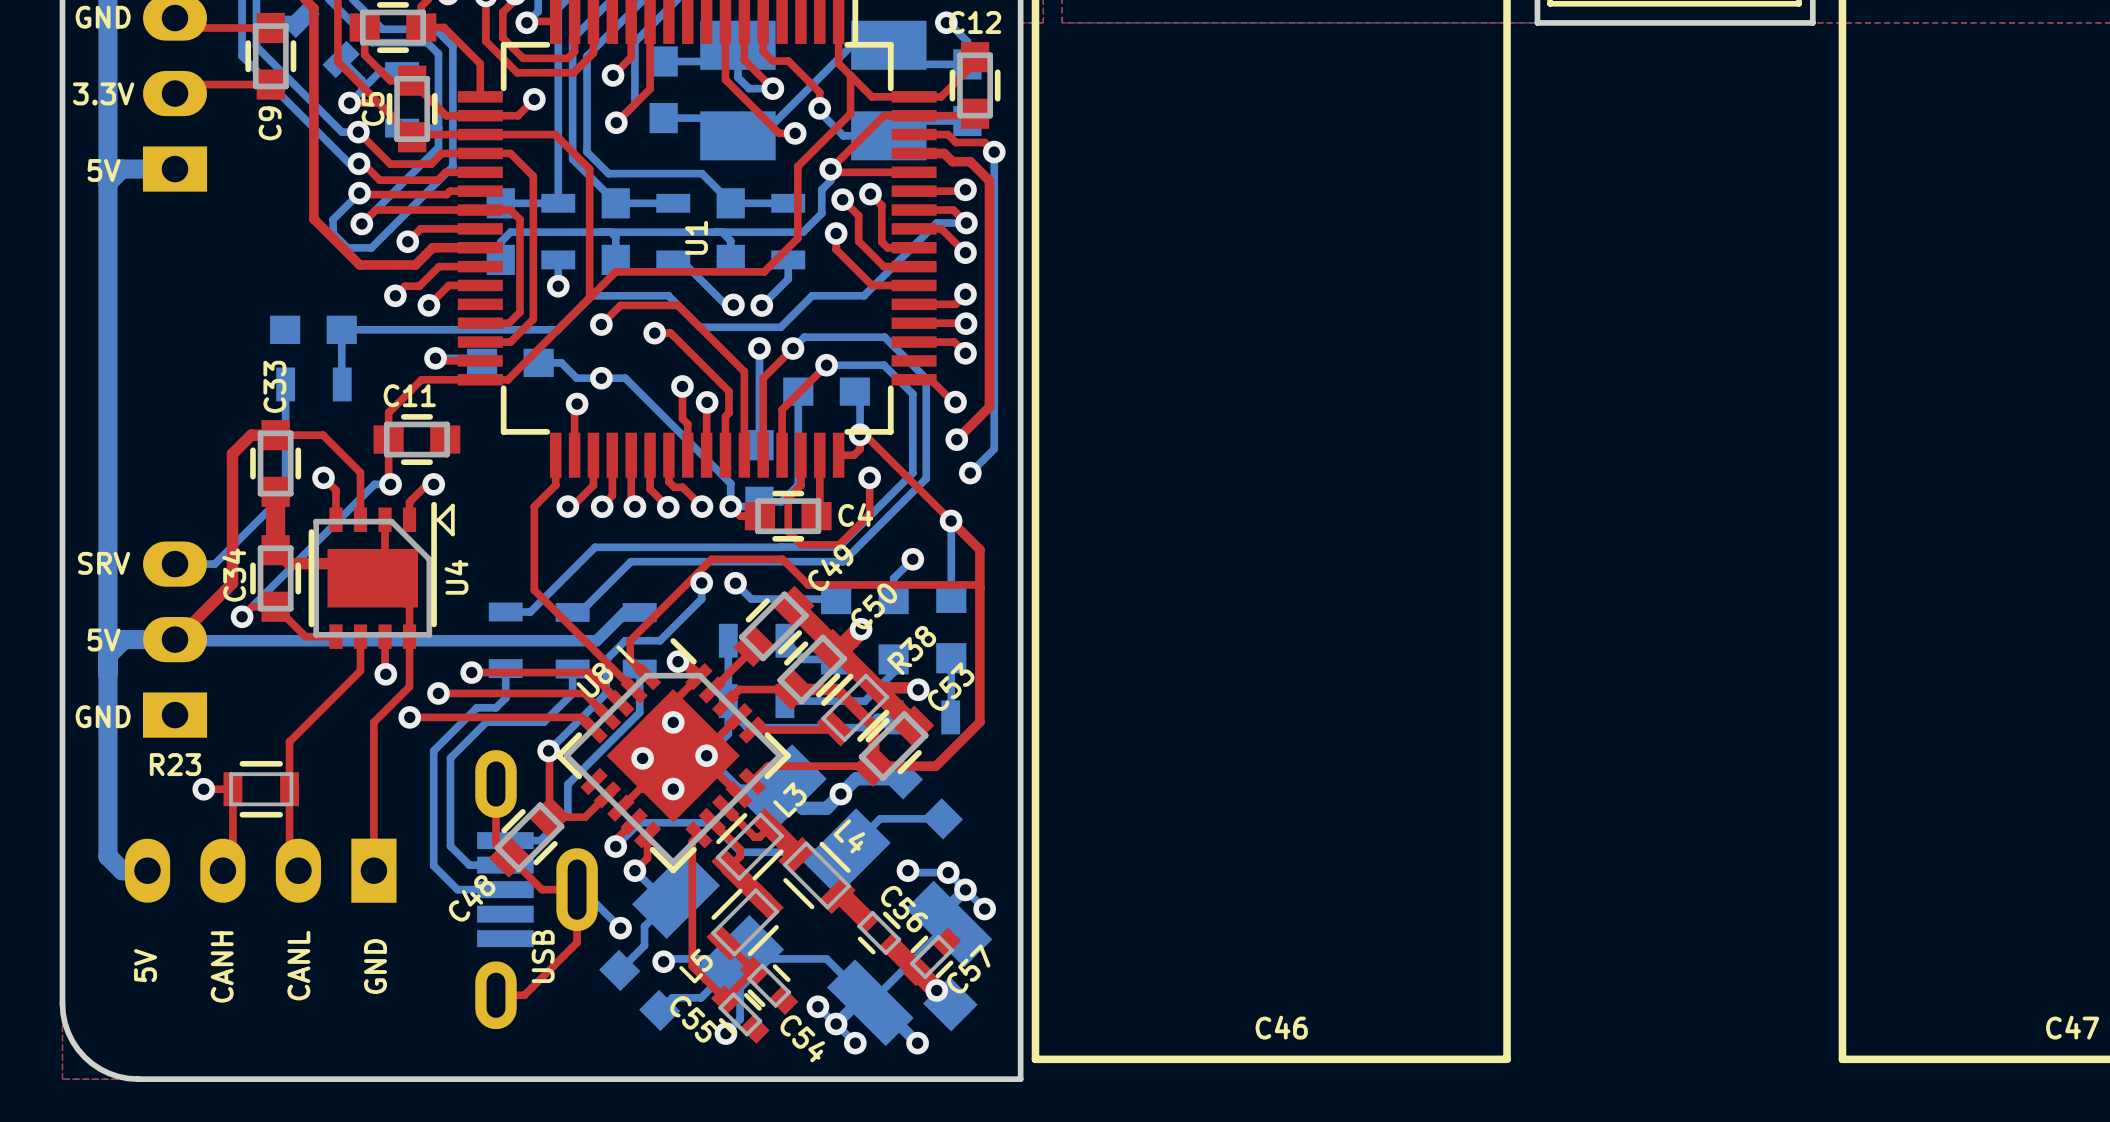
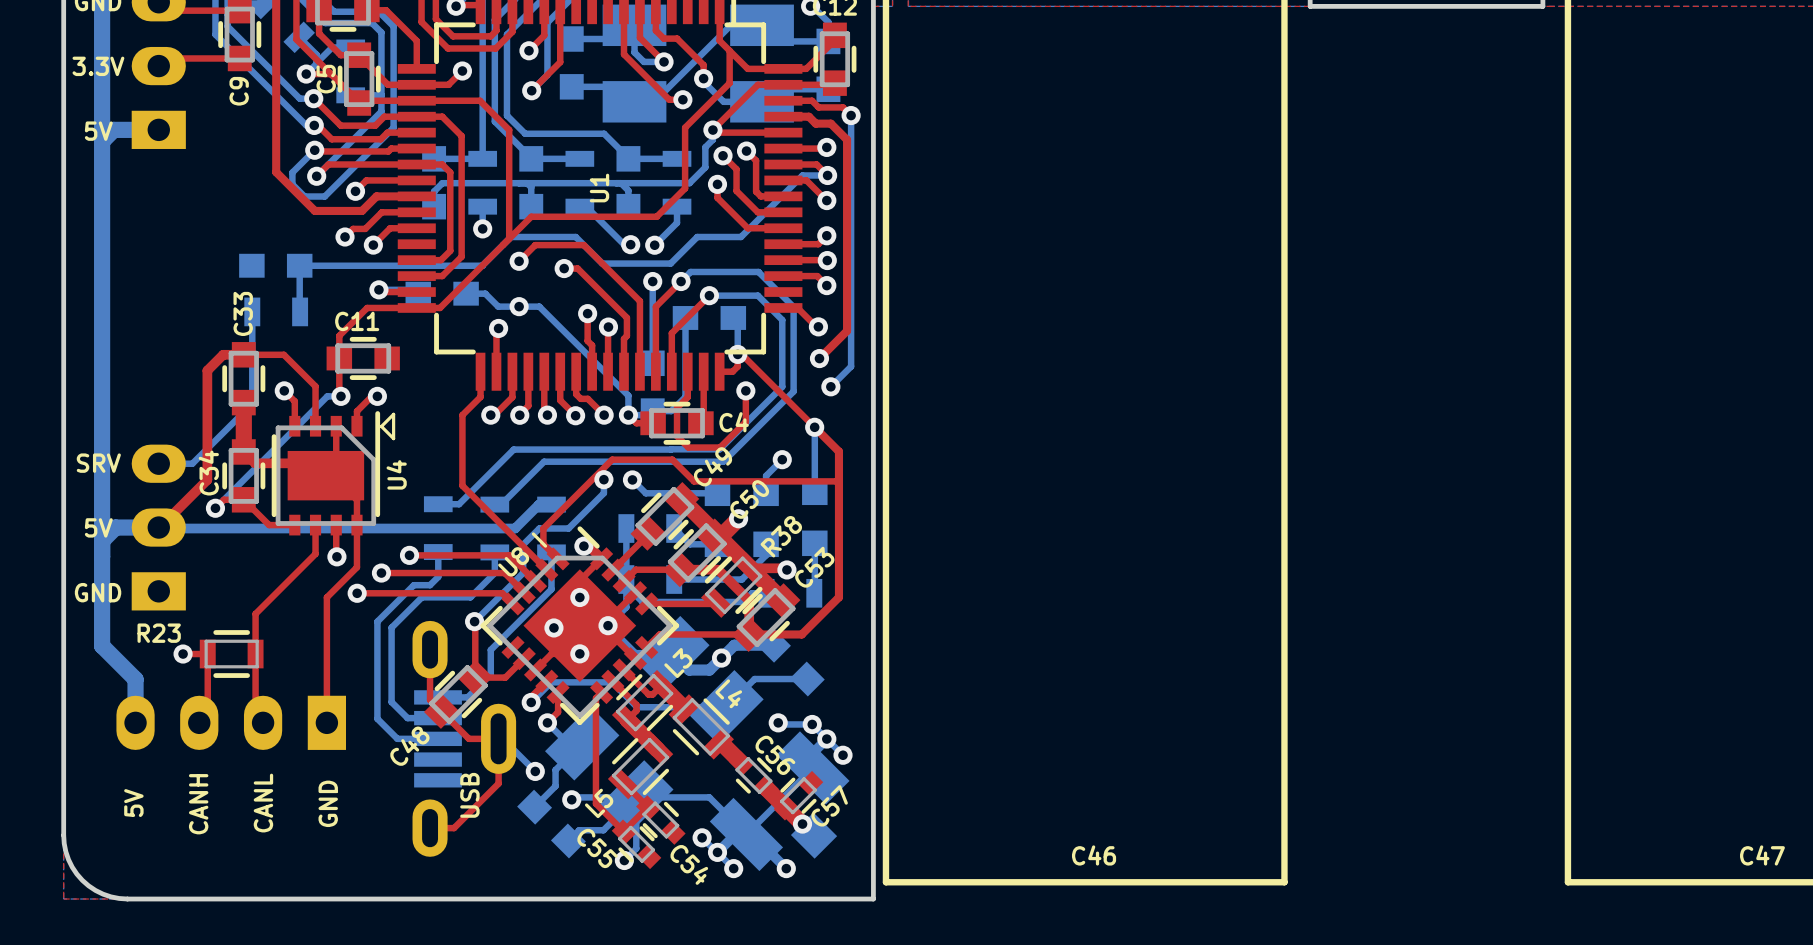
bottom track: (107, 779) (107, 856) (122, 870) (147, 870) -> (102, 645) (135, 679) (135, 722)

